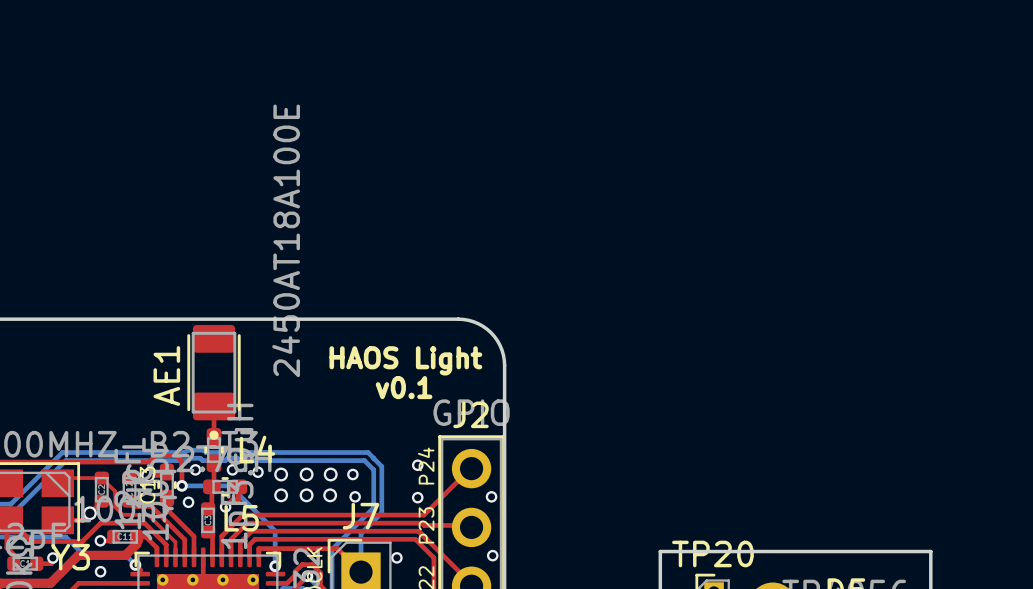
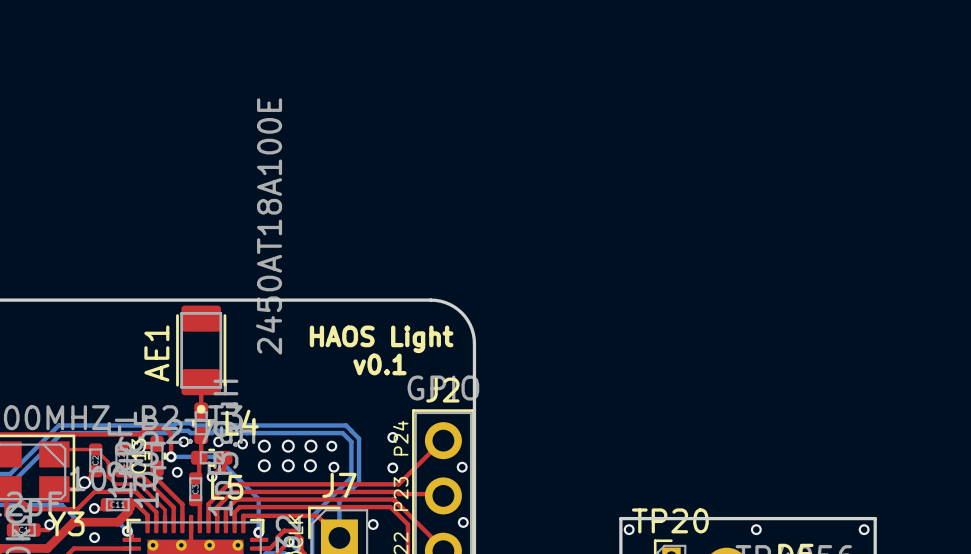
via: none -> (629, 529)
via: none -> (756, 529)
via: none -> (864, 529)

